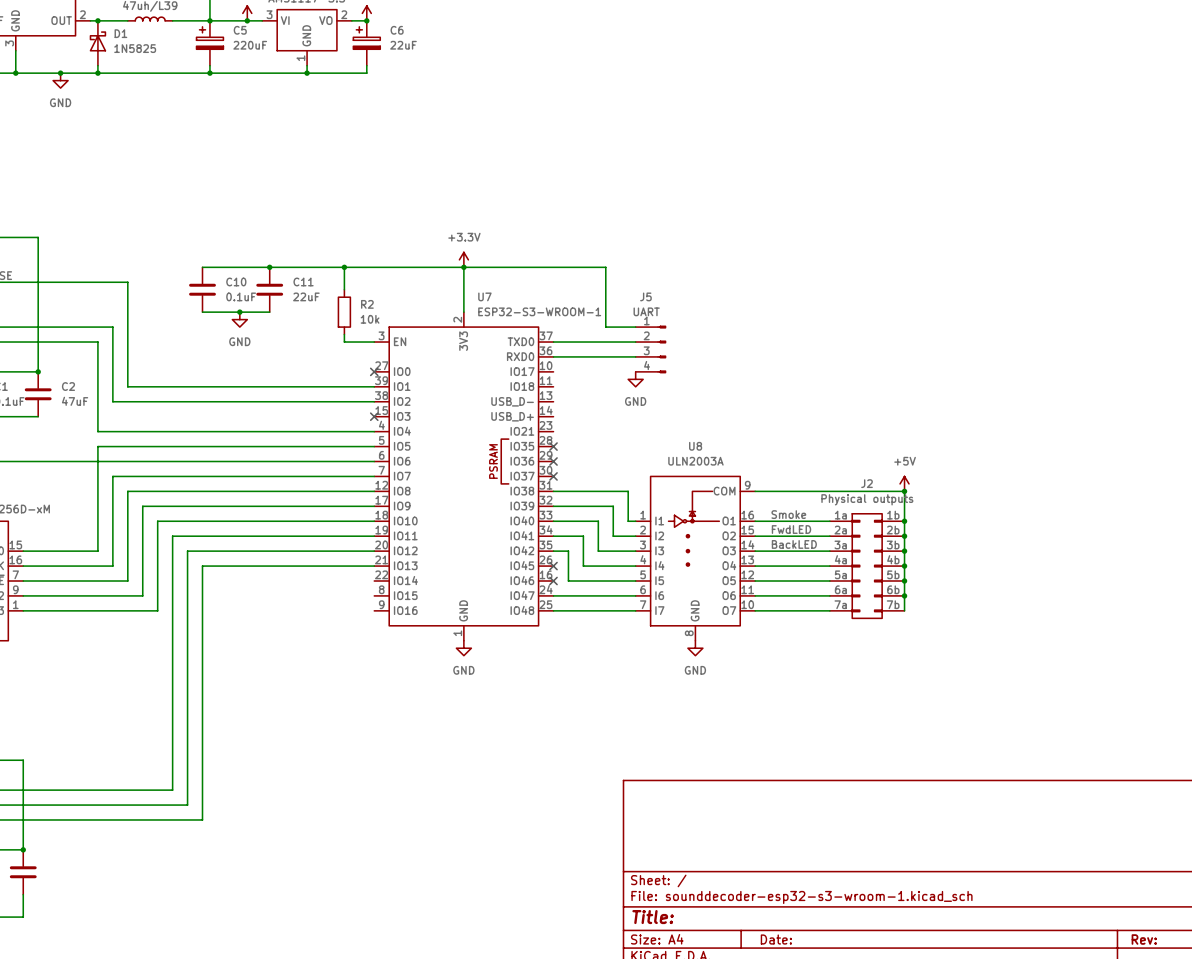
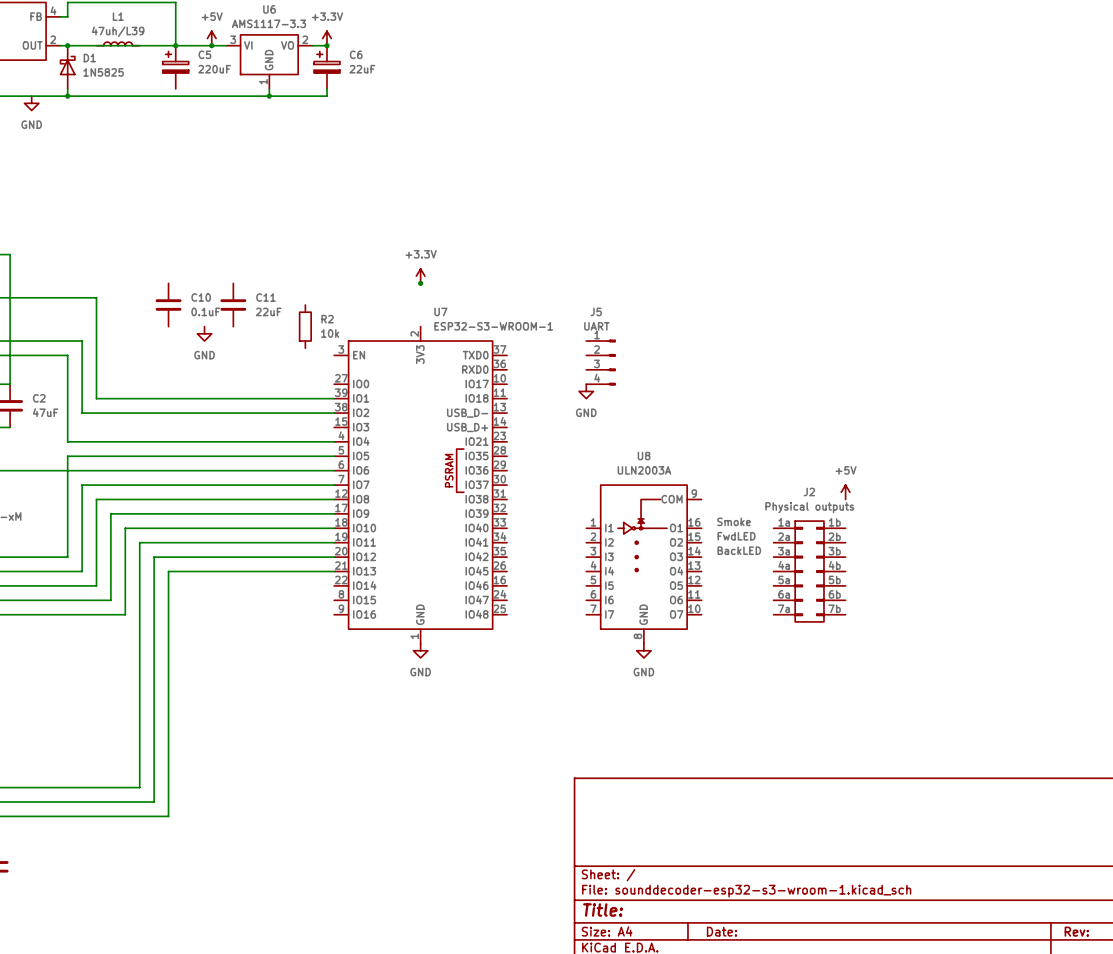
wire: none -> (96, 45) (139, 45)
wire: (209, 65) (209, 73) -> none
junction: (60, 73) -> none
junction: (209, 73) -> none
wire: (202, 267) (605, 267) (605, 327) (635, 327) -> none
junction: (269, 267) -> none
wire: (344, 267) (344, 289) -> none
junction: (344, 267) -> none
wire: (463, 267) (463, 312) -> none
wire: (202, 312) (269, 312) -> none
junction: (239, 312) -> none
wire: (344, 334) (344, 342) (374, 342) -> none
wire: (553, 342) (635, 342) -> none
wire: (553, 356) (635, 356) -> none
junction: (38, 371) -> none
no-connect mark: (374, 371) -> none
no-connect mark: (374, 416) -> none
no-connect mark: (553, 446) -> none
no-connect mark: (553, 461) -> none
no-connect mark: (553, 476) -> none
wire: (553, 491) (628, 491) (628, 521) (635, 521) -> none
wire: (755, 491) (904, 491) (904, 610) -> none
junction: (904, 491) -> none
wire: (553, 506) (613, 506) (613, 536) (635, 536) -> none
wire: (553, 521) (598, 521) (598, 551) (635, 551) -> none
wire: (755, 521) (829, 521) -> none
junction: (904, 521) -> none
wire: (553, 536) (583, 536) (583, 566) (635, 566) -> none
wire: (755, 536) (829, 536) -> none
junction: (904, 536) -> none
wire: (553, 551) (568, 551) (568, 581) (635, 581) -> none
wire: (755, 551) (829, 551) -> none
junction: (904, 551) -> none
no-connect mark: (553, 566) -> none
wire: (755, 566) (829, 566) -> none
junction: (904, 566) -> none
no-connect mark: (553, 581) -> none
wire: (755, 581) (829, 581) -> none
junction: (904, 581) -> none
wire: (553, 595) (635, 595) -> none
wire: (755, 595) (829, 595) -> none
junction: (904, 595) -> none
wire: (553, 610) (635, 610) -> none
wire: (755, 610) (829, 610) -> none

